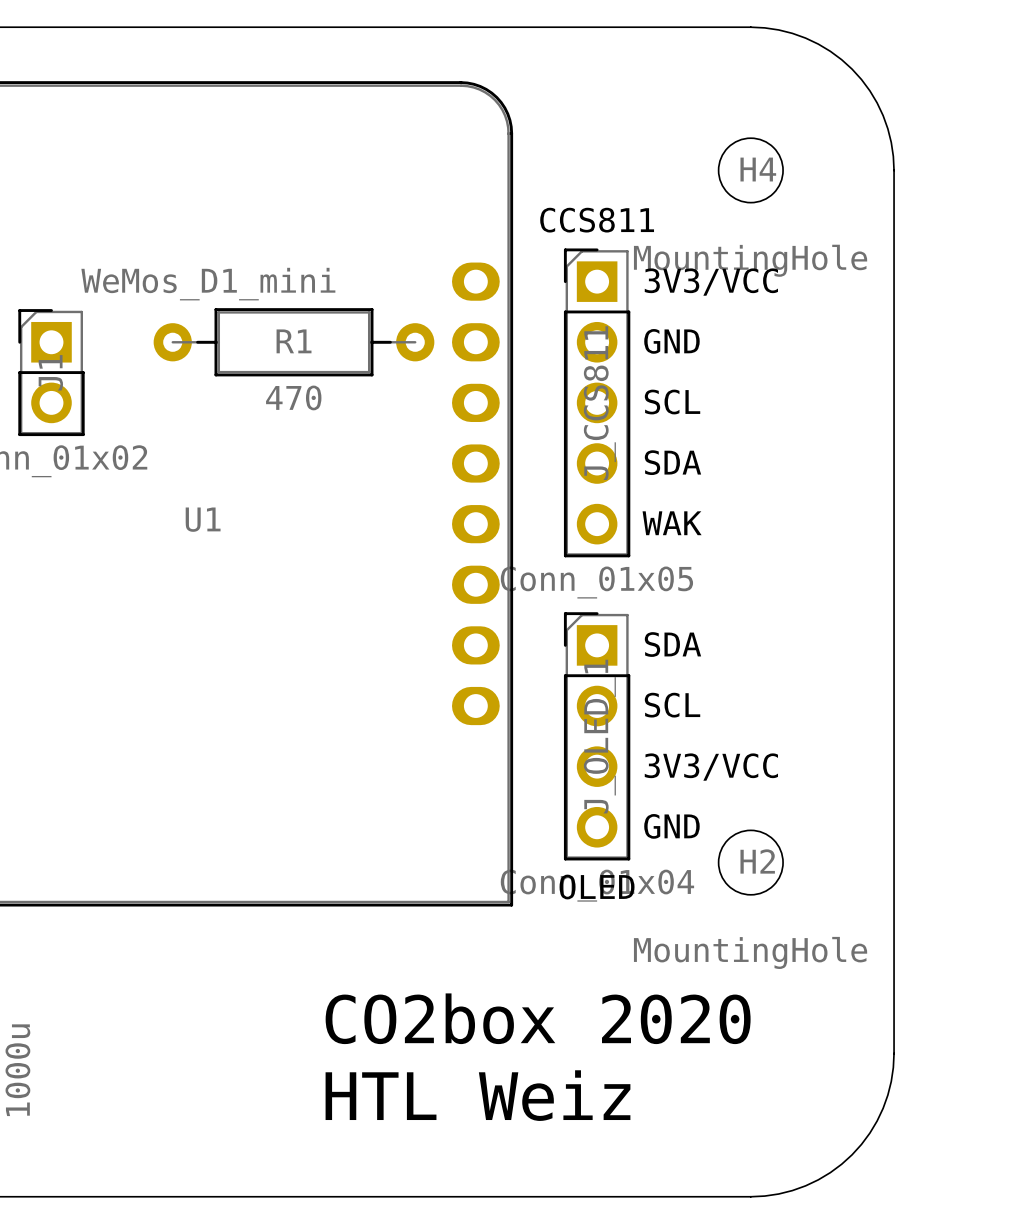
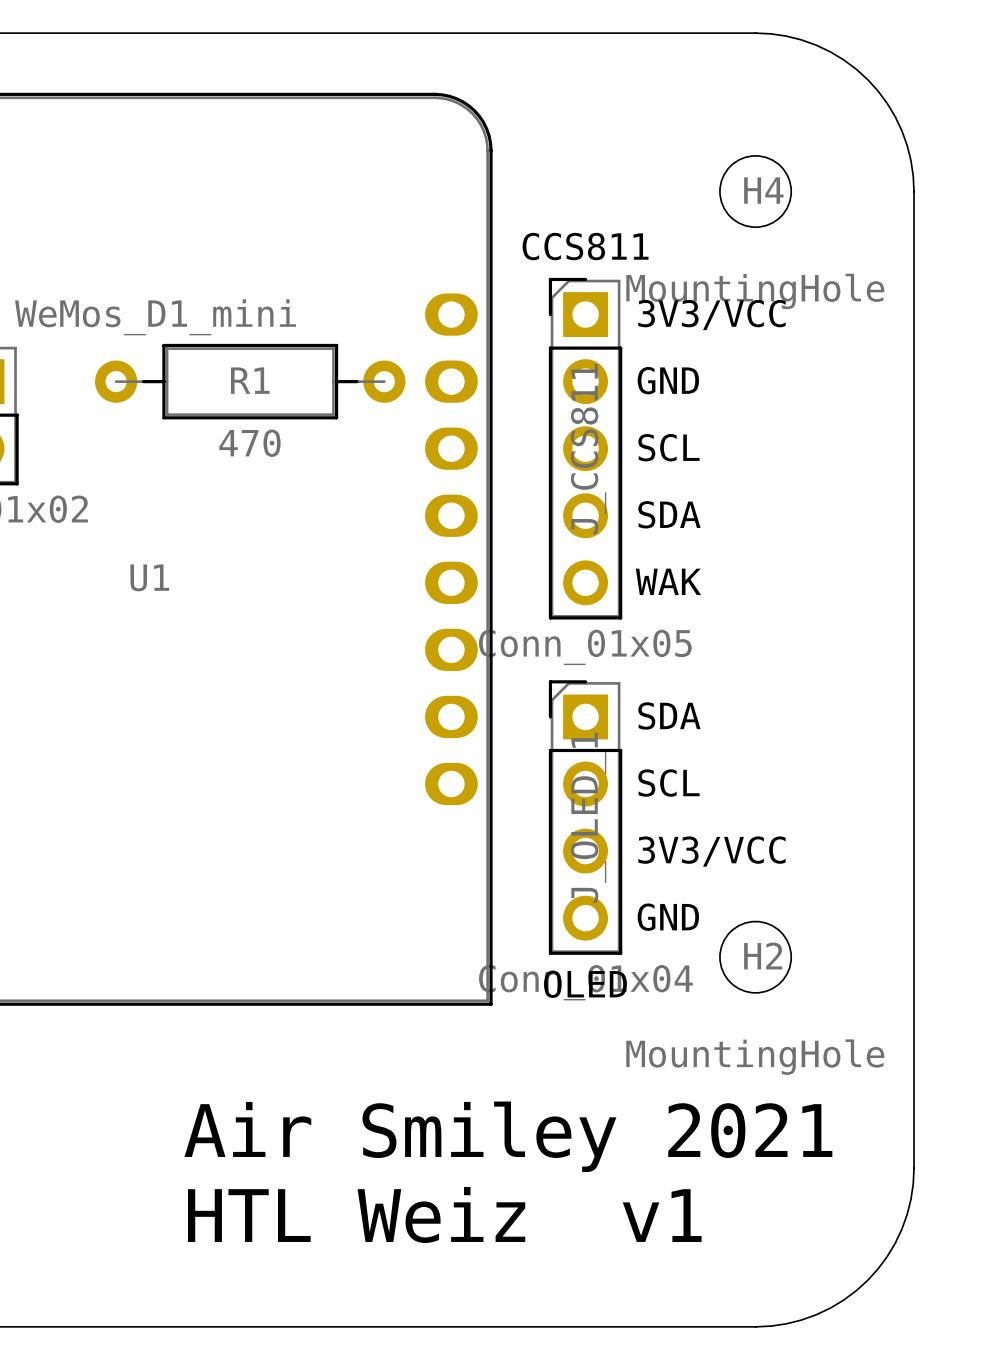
text: CO2box 2020 (538, 1018) -> none
text: none -> Air Smiley 2021 (508, 1136)
text: HTL Weiz (477, 1095) -> HTL Weiz v1 (444, 1214)

